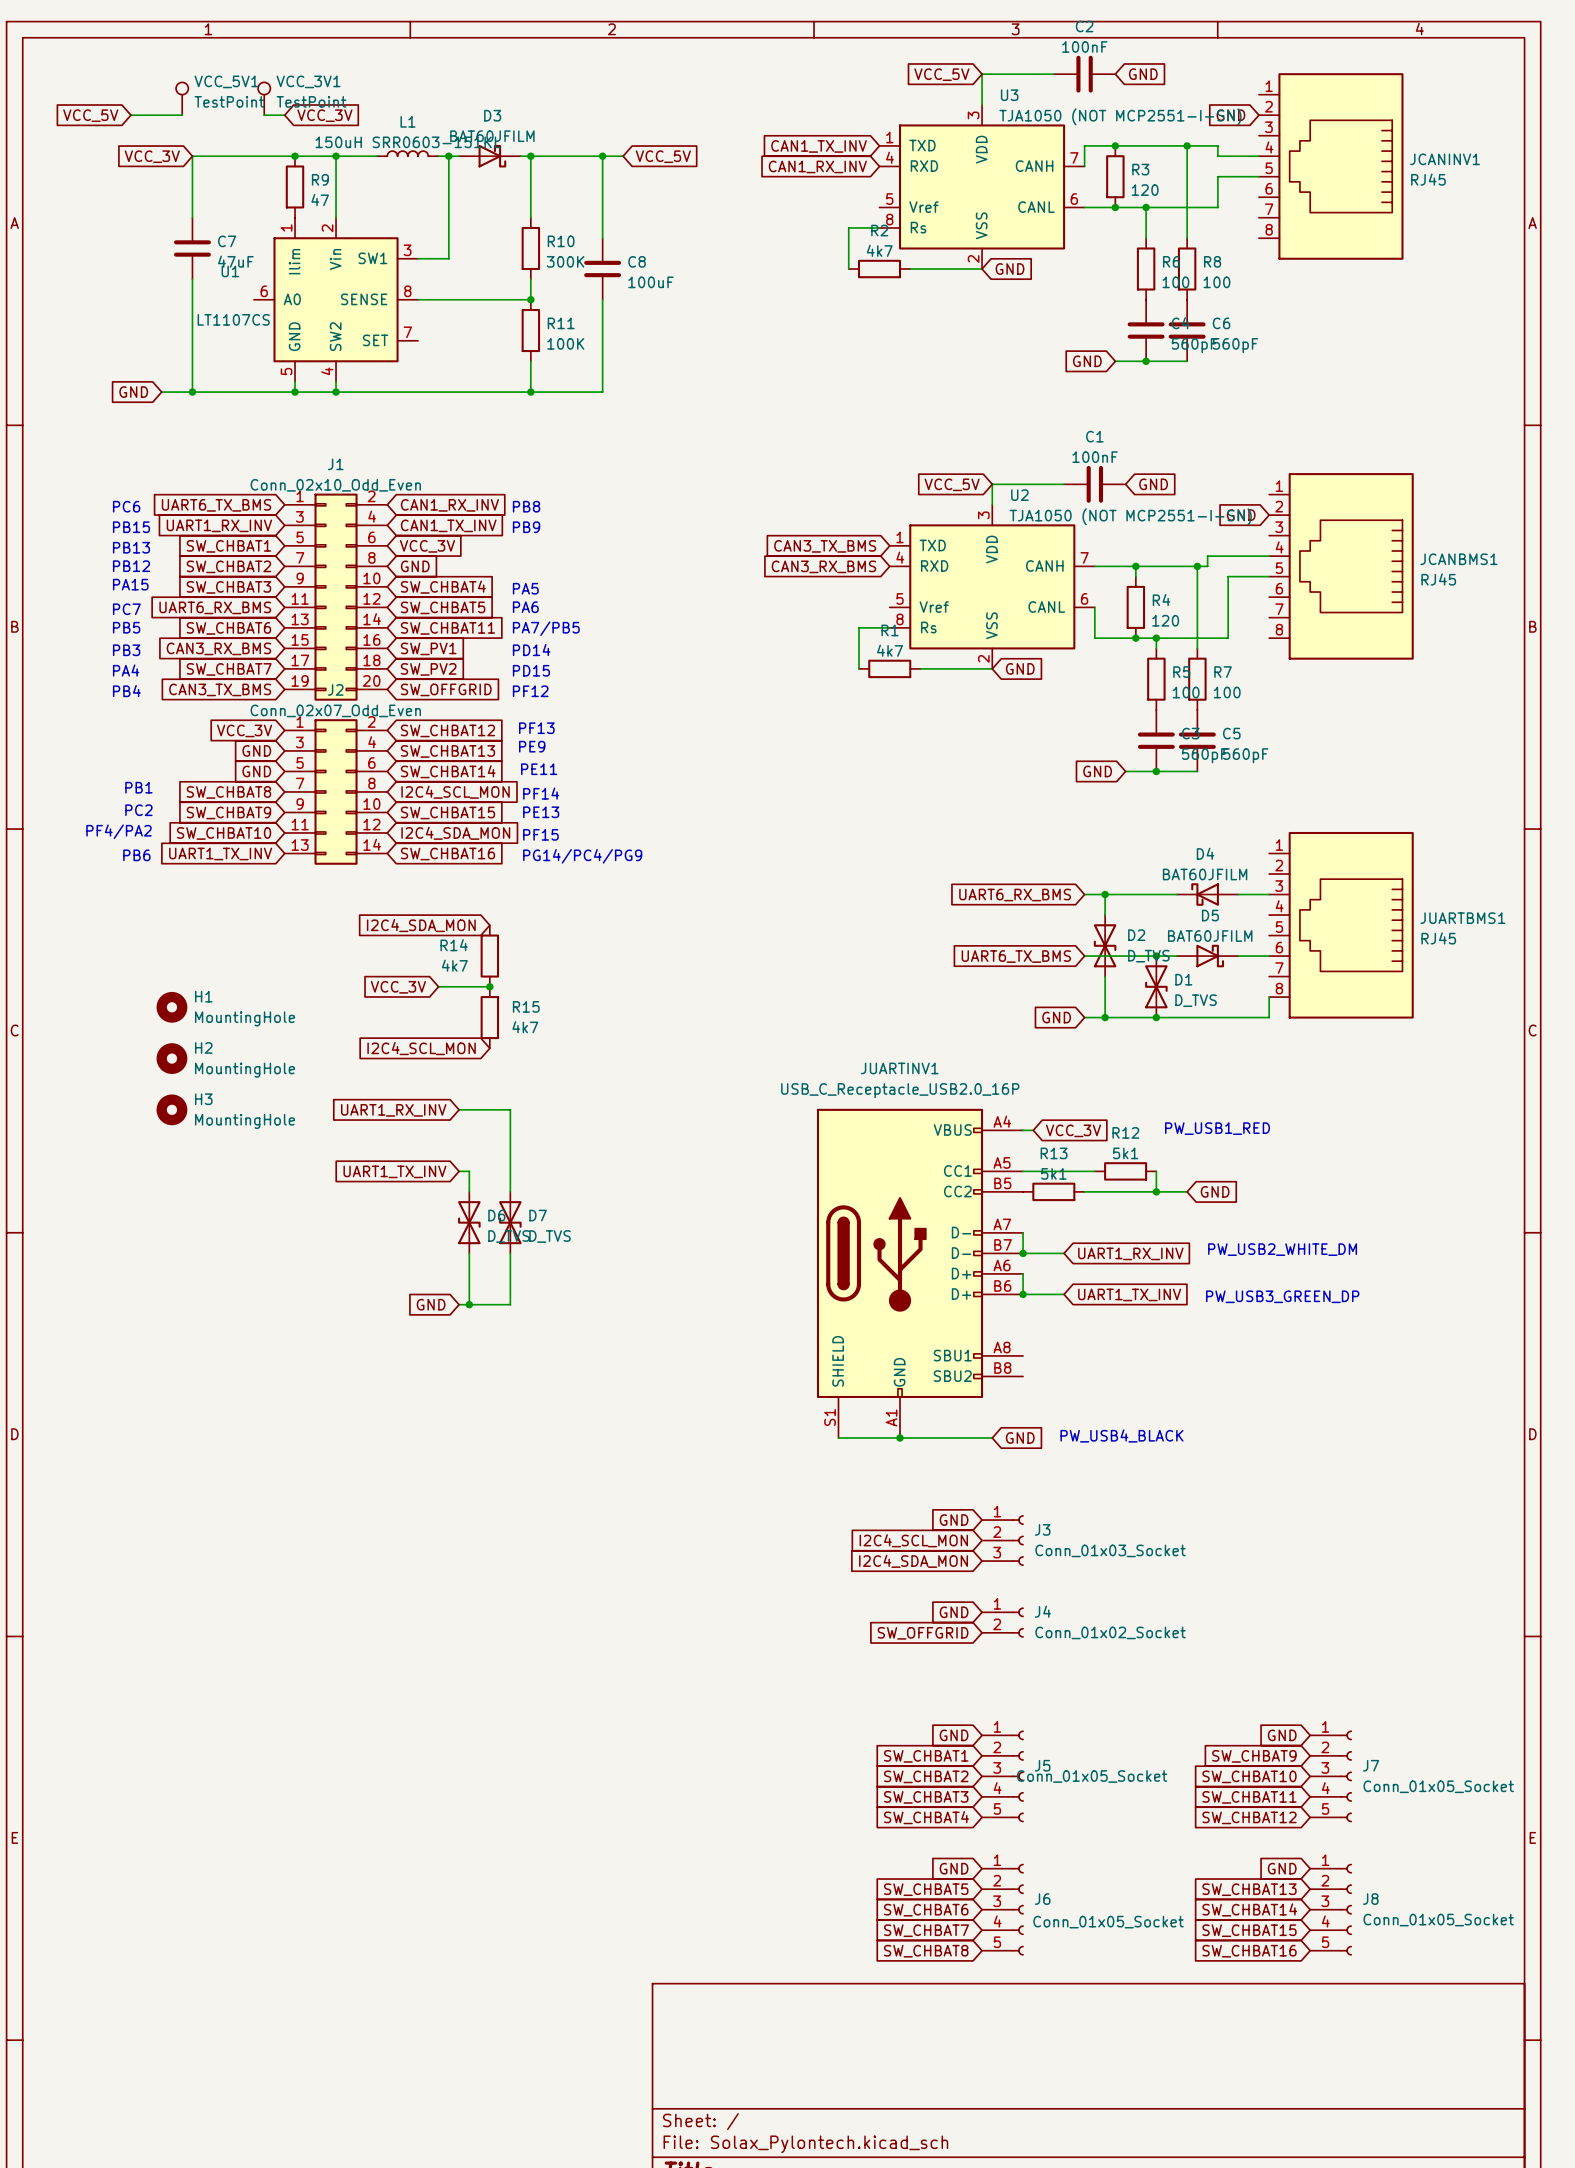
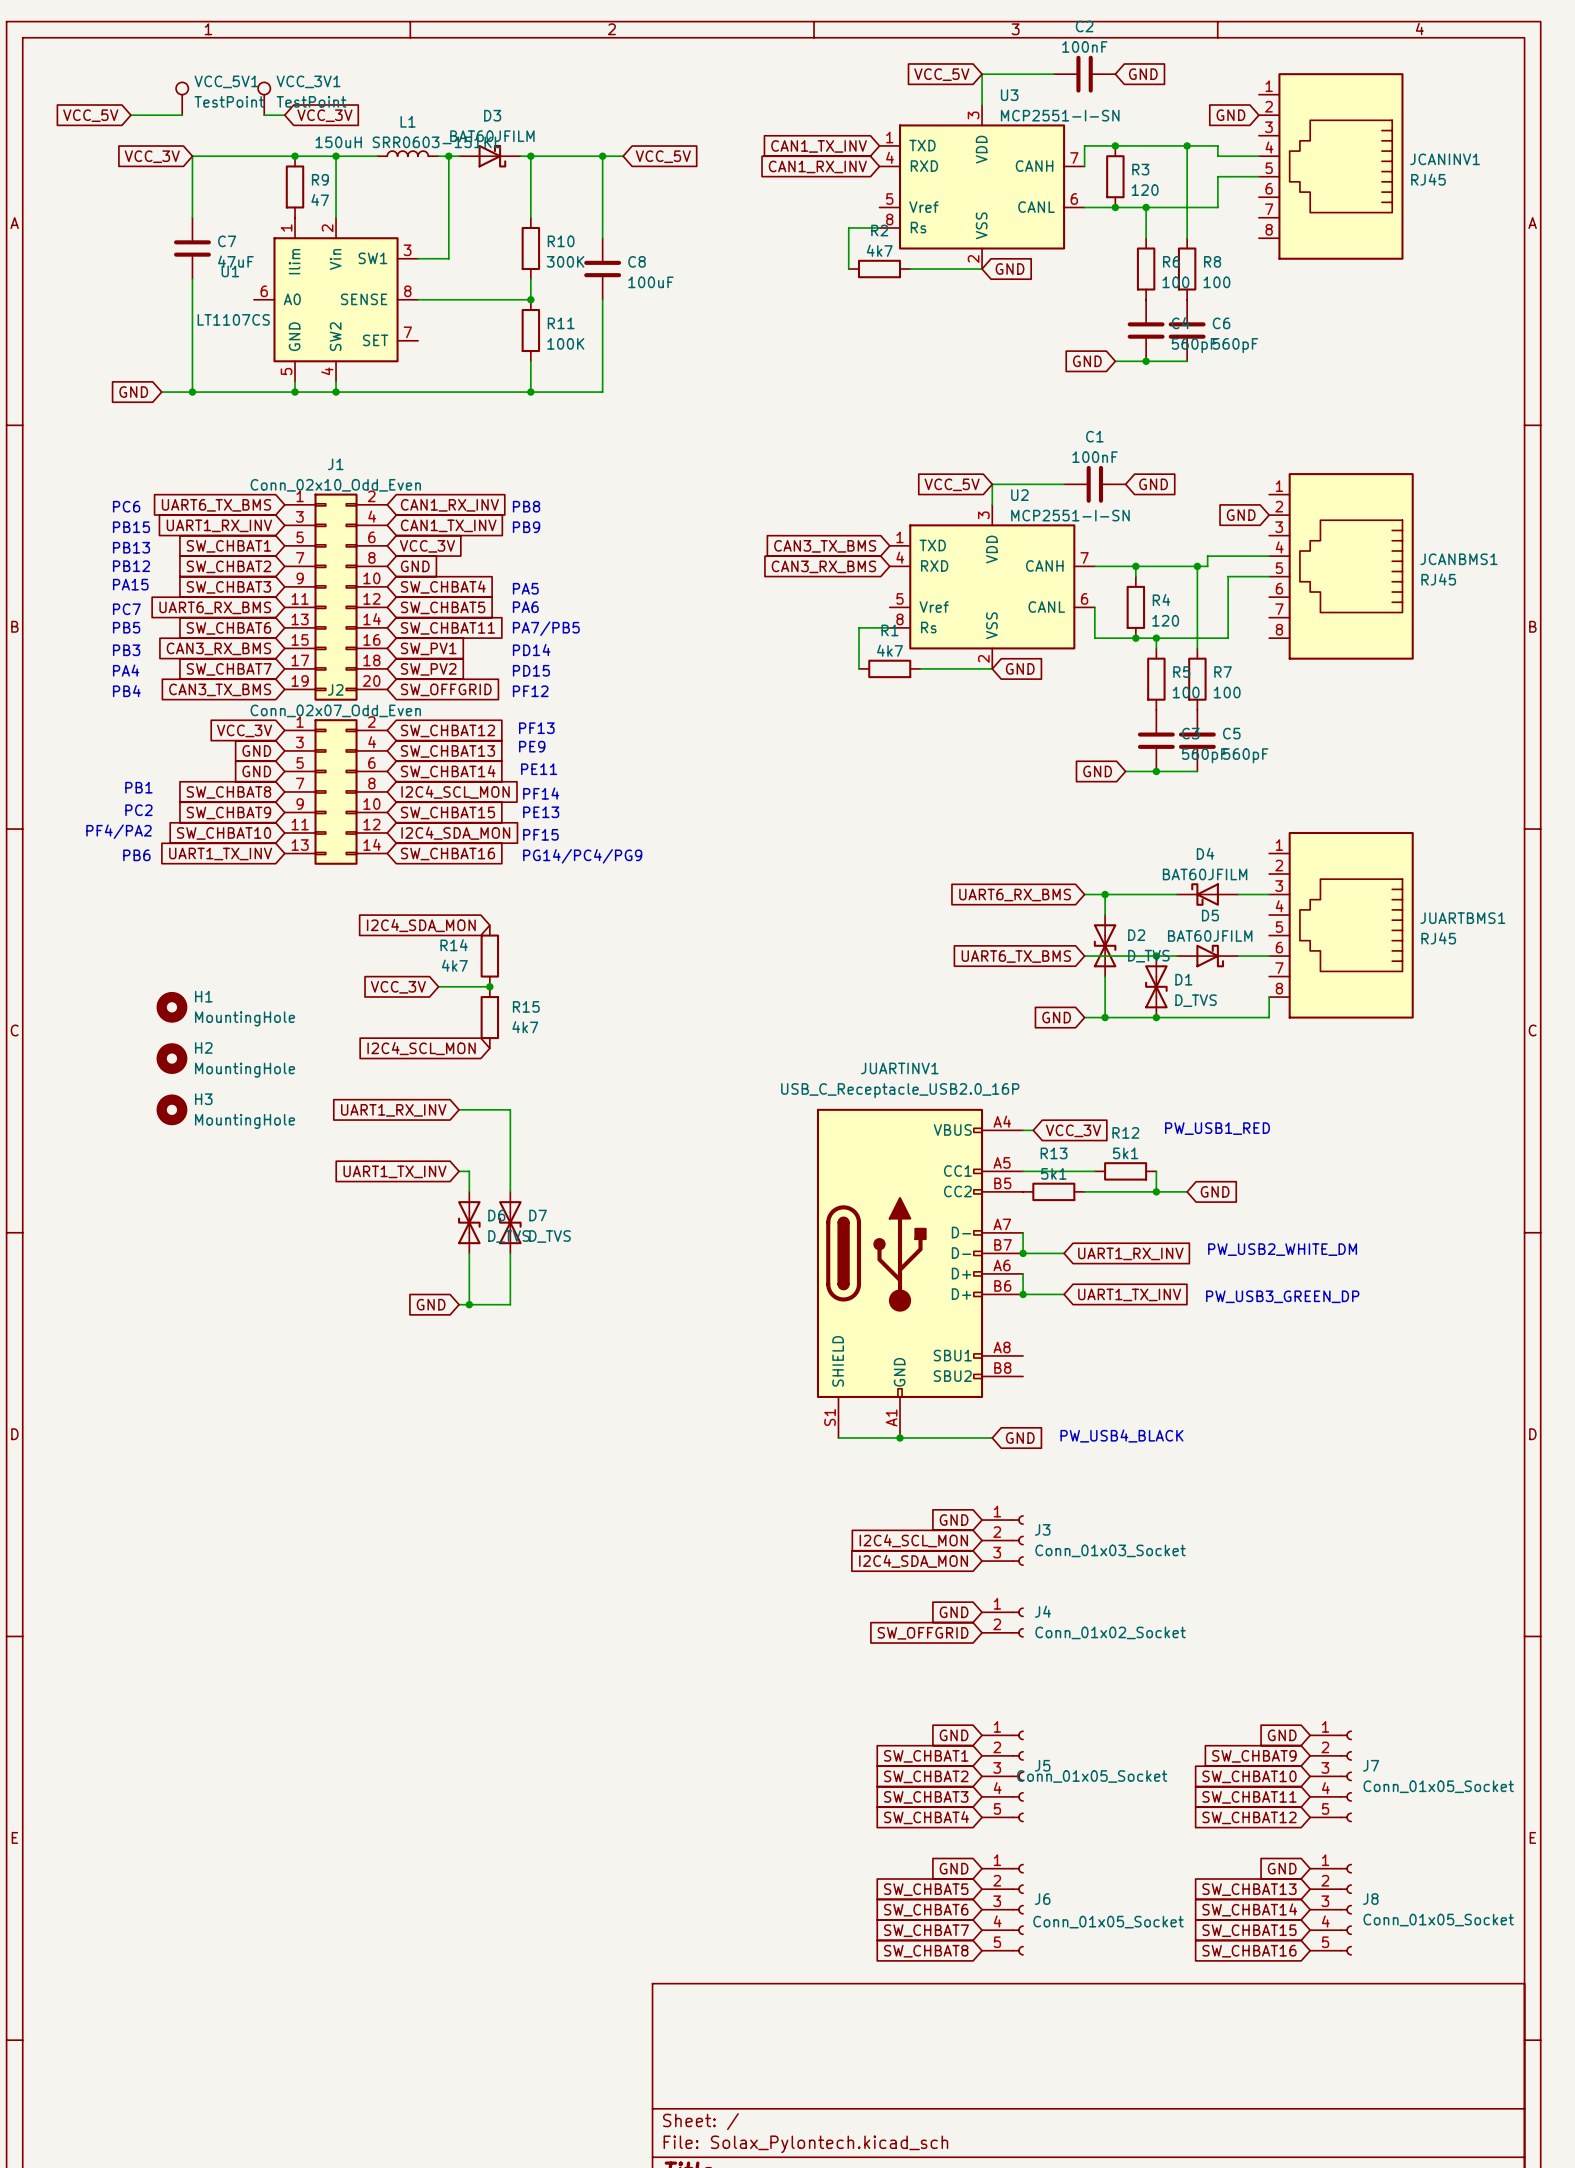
U3 value: TJA1050 (NOT MCP2551-I-SN) (1120, 116) -> MCP2551-I-SN (1060, 115)
U2 value: TJA1050 (NOT MCP2551-I-SN) (1130, 516) -> MCP2551-I-SN (1070, 515)

